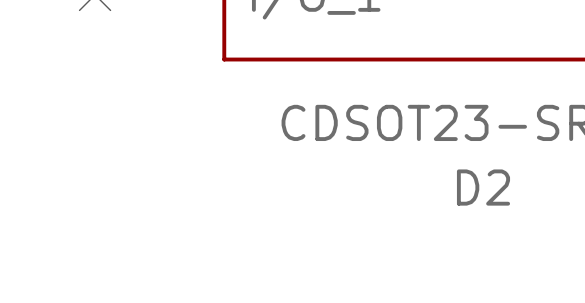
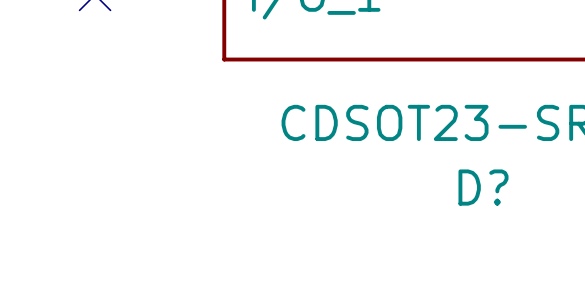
D2 name: D2 (483, 187) -> D? (483, 187)

